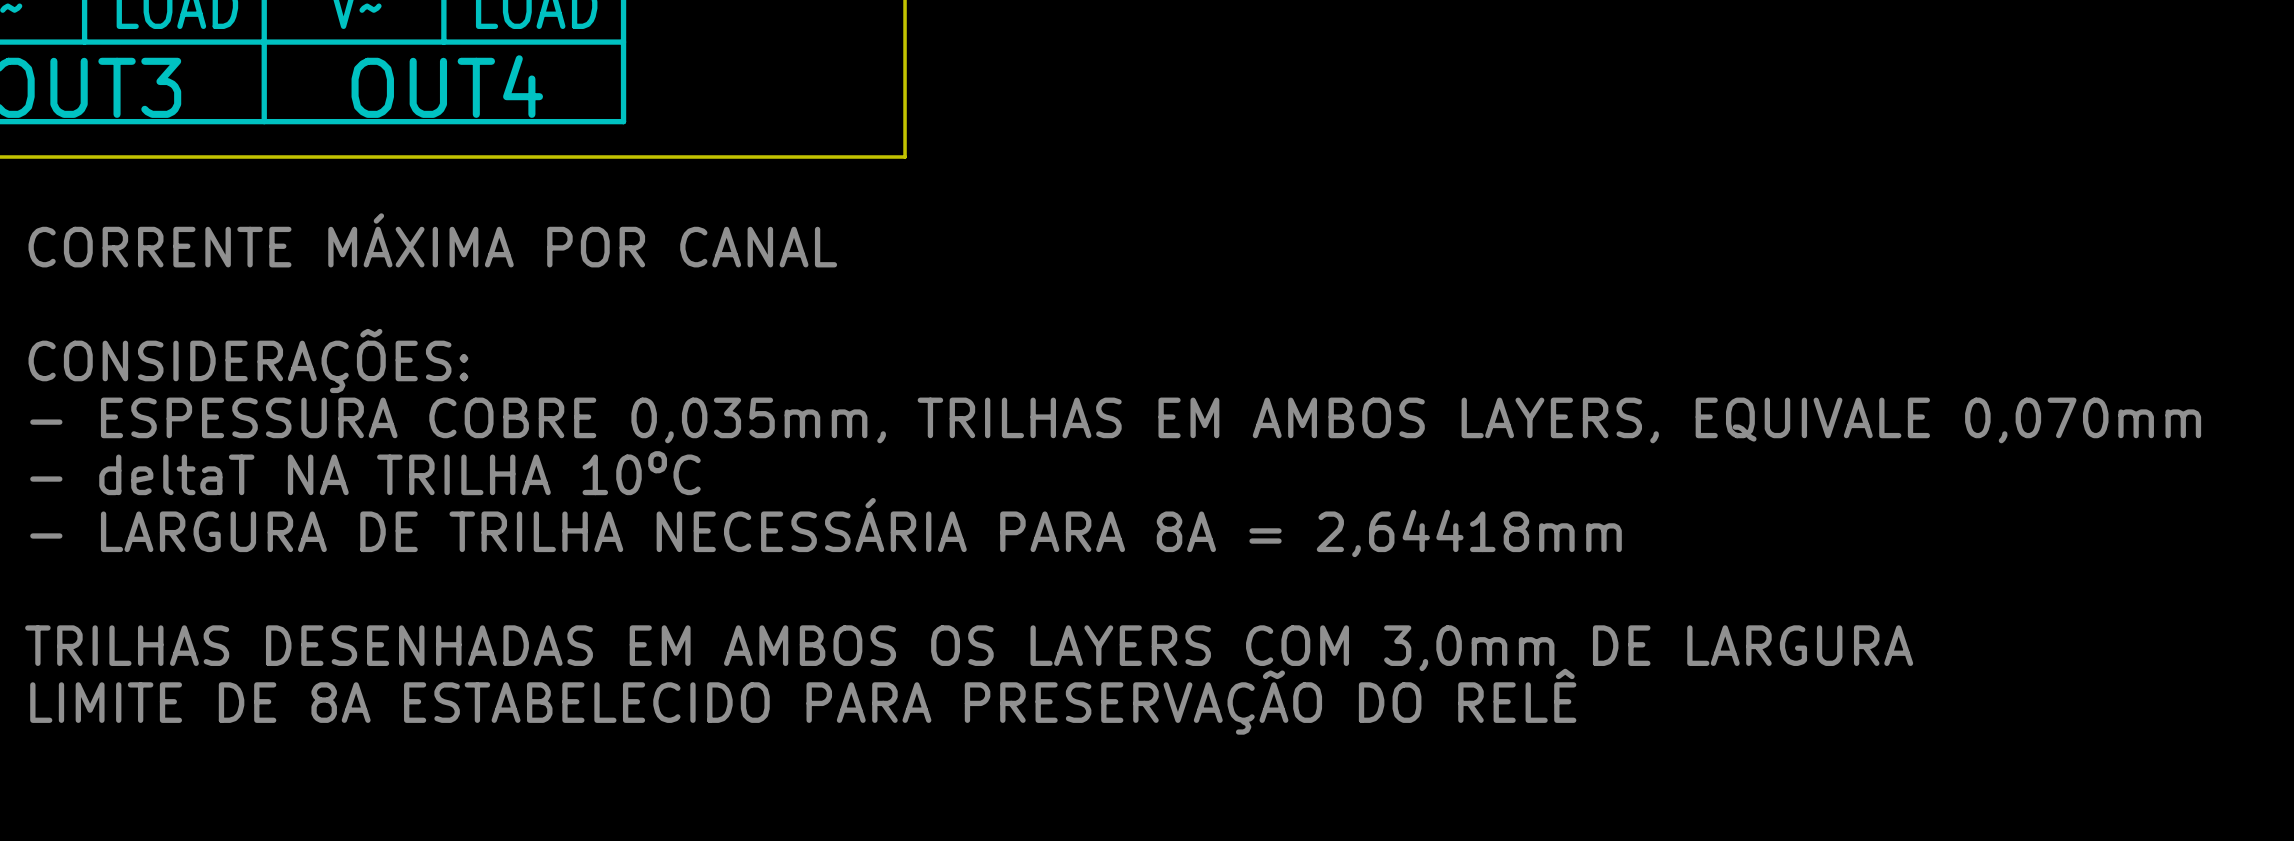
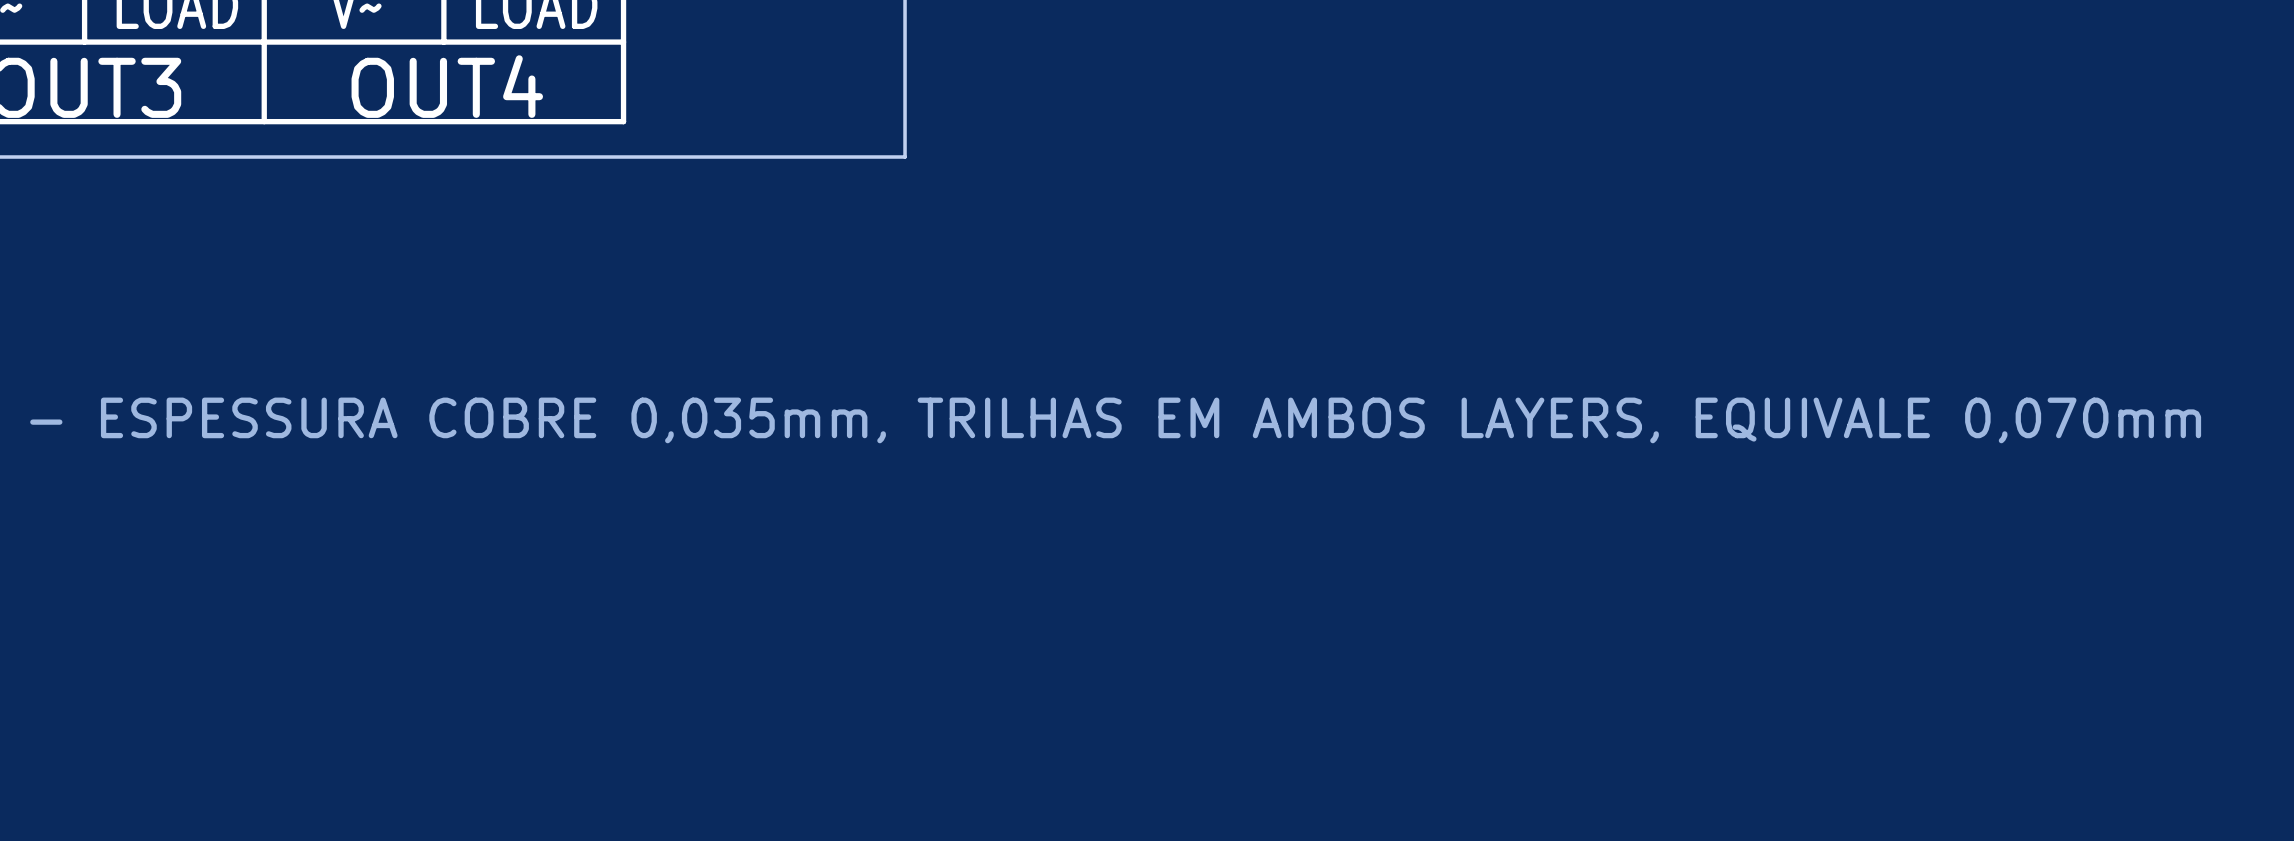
text: CORRENTE MÁXIMA POR CANAL (432, 240) -> none
text: CONSIDERAÇÕES: (248, 360) -> none
text: - deltaT NA TRILHA 10ºC (365, 473) -> none
text: - LARGURA DE TRILHA NECESSÁRIA PARA 8A = 2,64418mm (826, 527) -> none
text: TRILHAS DESENHADAS EM AMBOS OS LAYERS COM 3,0mm DE LARGURA (969, 648) -> none
text: LIMITE DE 8A ESTABELECIDO PARA PRESERVAÇÃO DO RELÊ (803, 701) -> none

